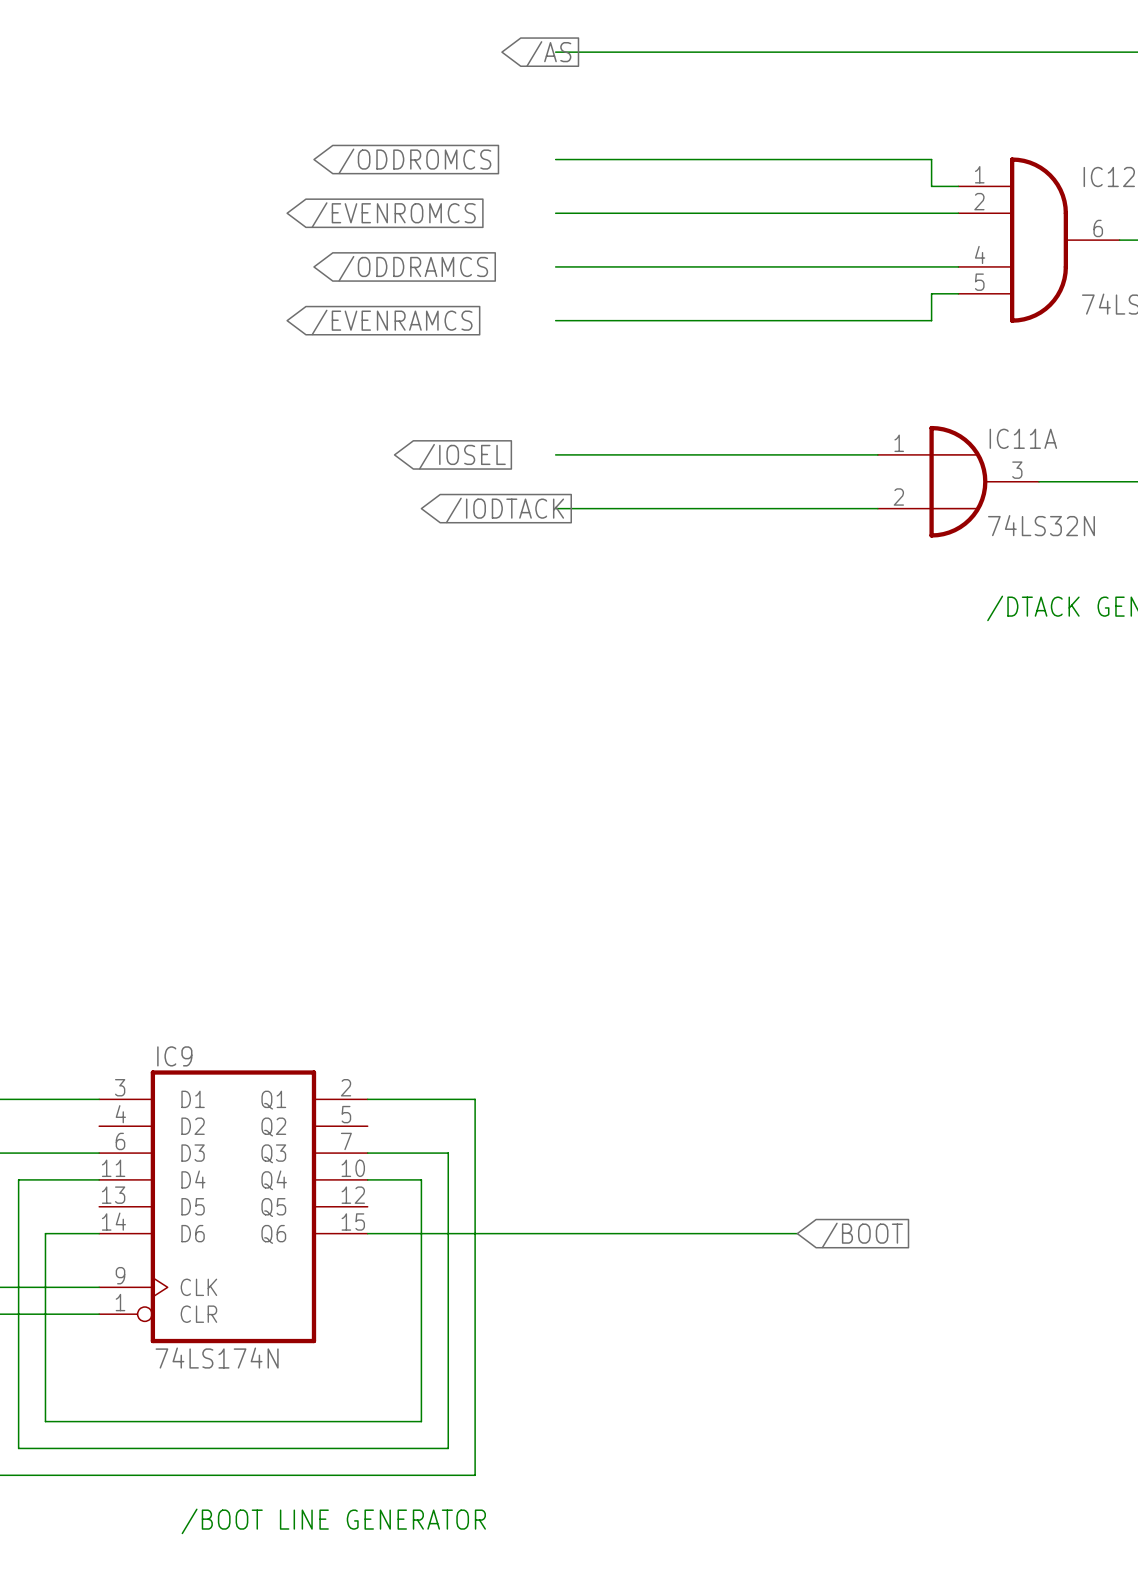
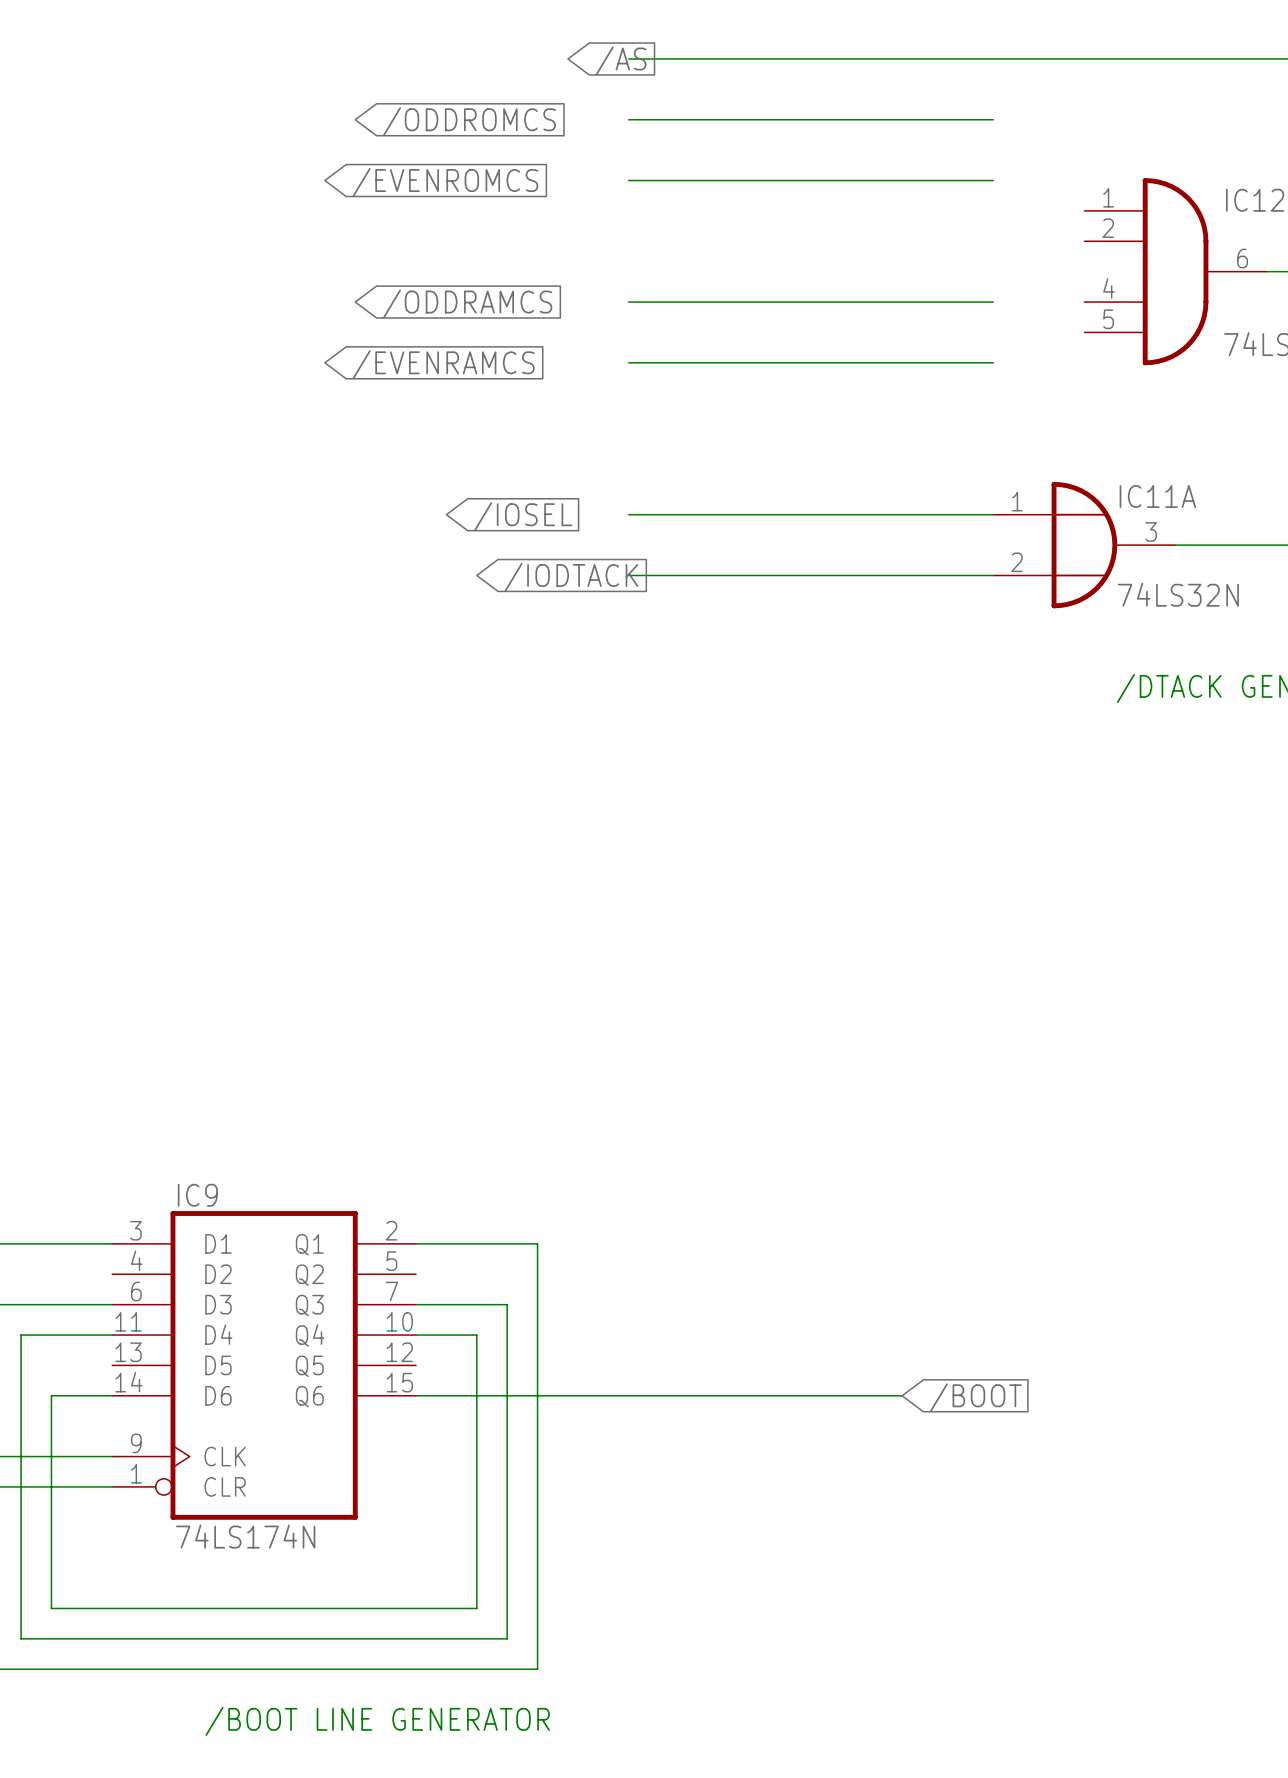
wire: none -> (628, 119) (993, 119)
wire: (877, 159) (931, 159) (931, 186) (958, 186) -> none
global label position: /ODDROMCS (414, 161) -> /ODDROMCS (469, 121)
wire: (555, 213) (958, 213) -> none
global label position: /EVENROMCS (393, 215) -> /EVENROMCS (445, 182)
wire: (877, 266) (958, 266) -> none
wire: (958, 293) (931, 293) (931, 320) (877, 320) -> none

